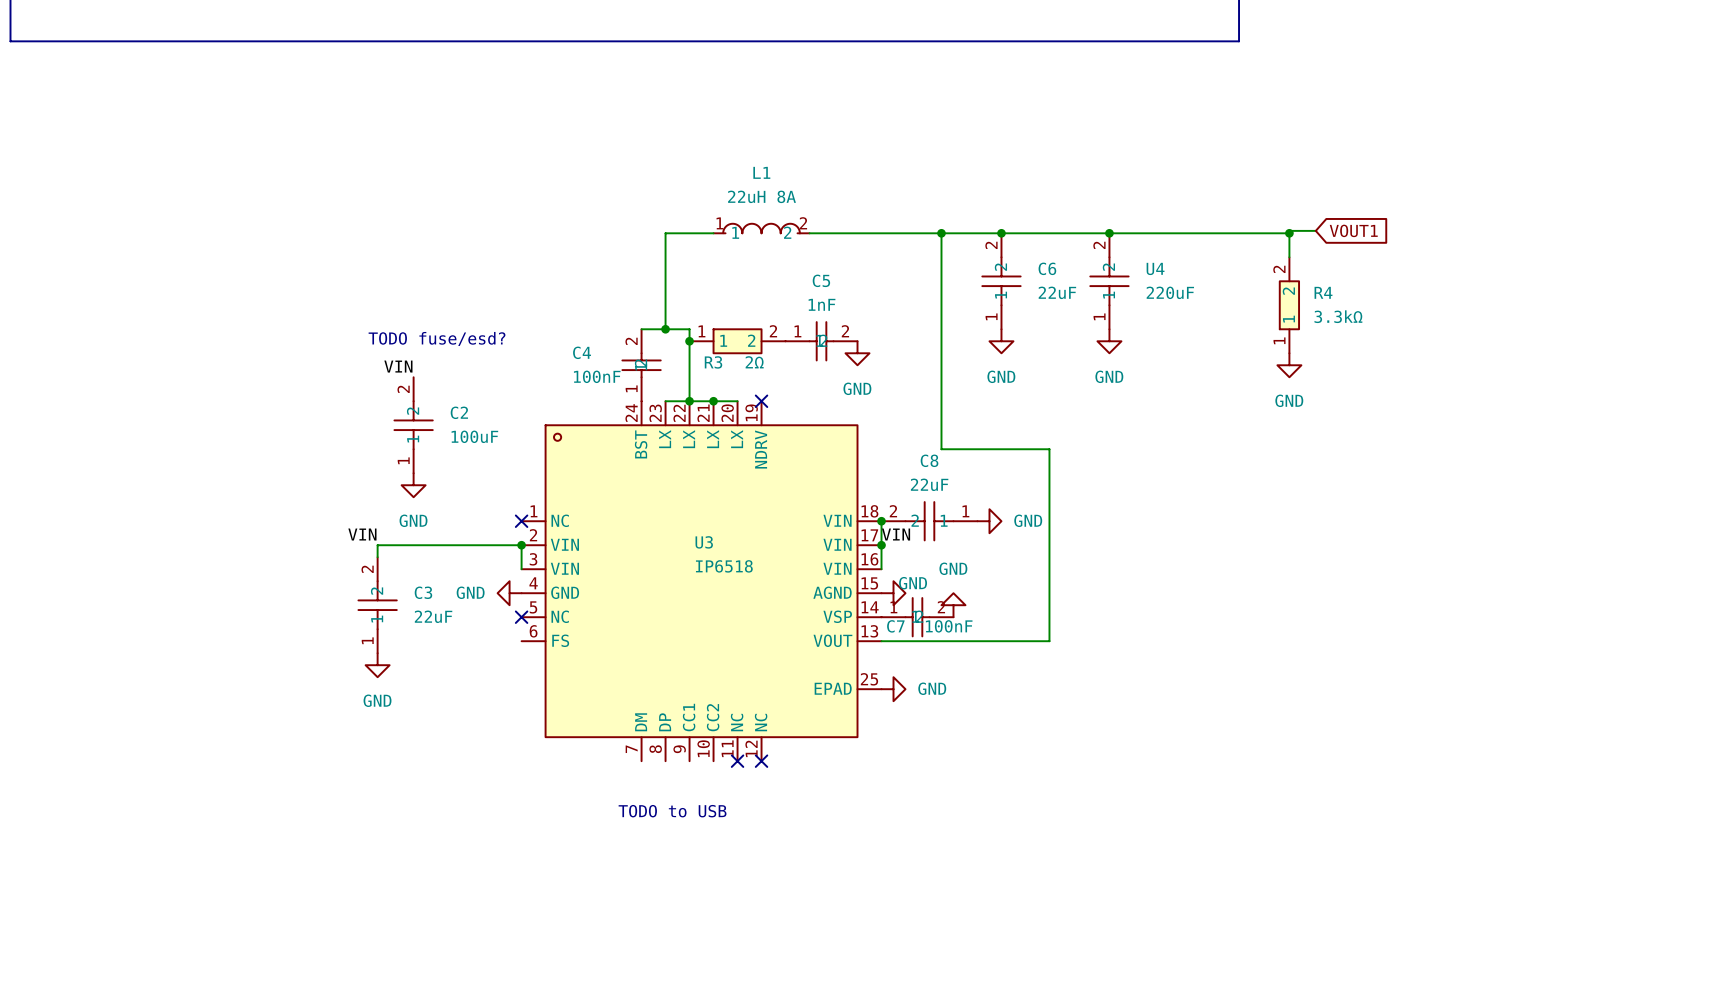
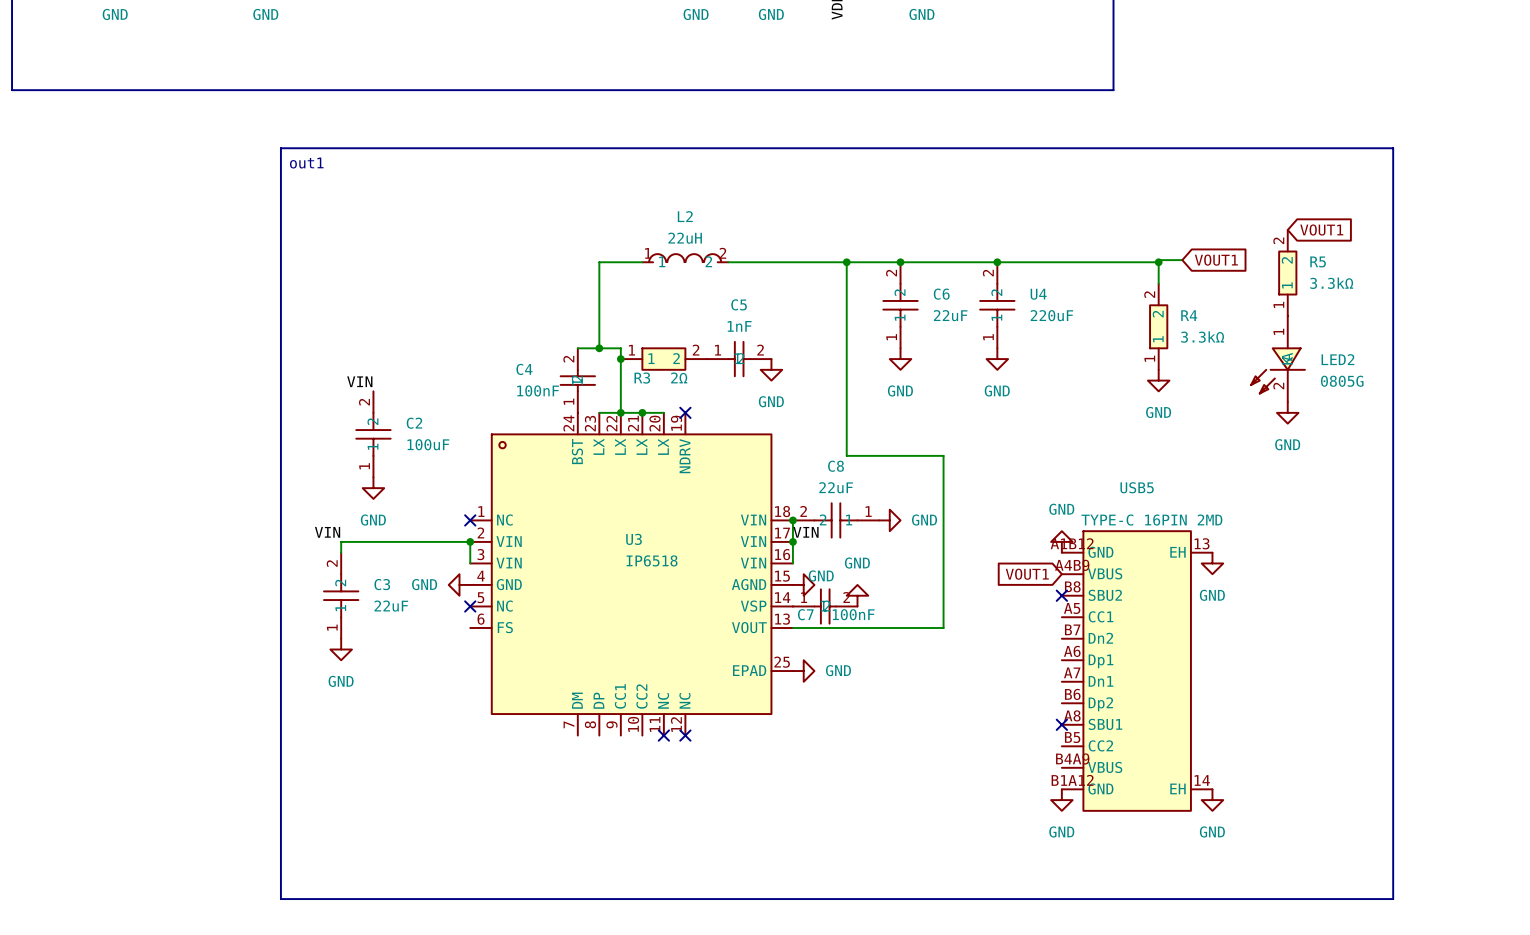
line: none -> (280, 148) (1393, 148) (1393, 899) (280, 899) (280, 148)
text: none -> out1 (306, 163)
global label: none -> VOUT1 (1321, 230)
L1: 22uH 8A (761, 228) -> none
L2: none -> 22uH (685, 258)
R5: none -> 3.3kΩ (1287, 273)
text: TODO fuse/esd? (437, 338) -> none
LED2: none -> 0805G (1278, 359)
power symbol: none -> GND (1287, 412)
power symbol: none -> GND (1061, 541)
power symbol: none -> GND (1212, 563)
global label: none -> VOUT1 (1027, 574)
no-connect mark: none -> (1061, 595)
USB5: none -> TYPE-C 16PIN 2MD (1137, 671)
no-connect mark: none -> (1061, 724)
text: TODO to USB (672, 811) -> none
power symbol: none -> GND (1061, 800)
power symbol: none -> GND (1212, 800)

